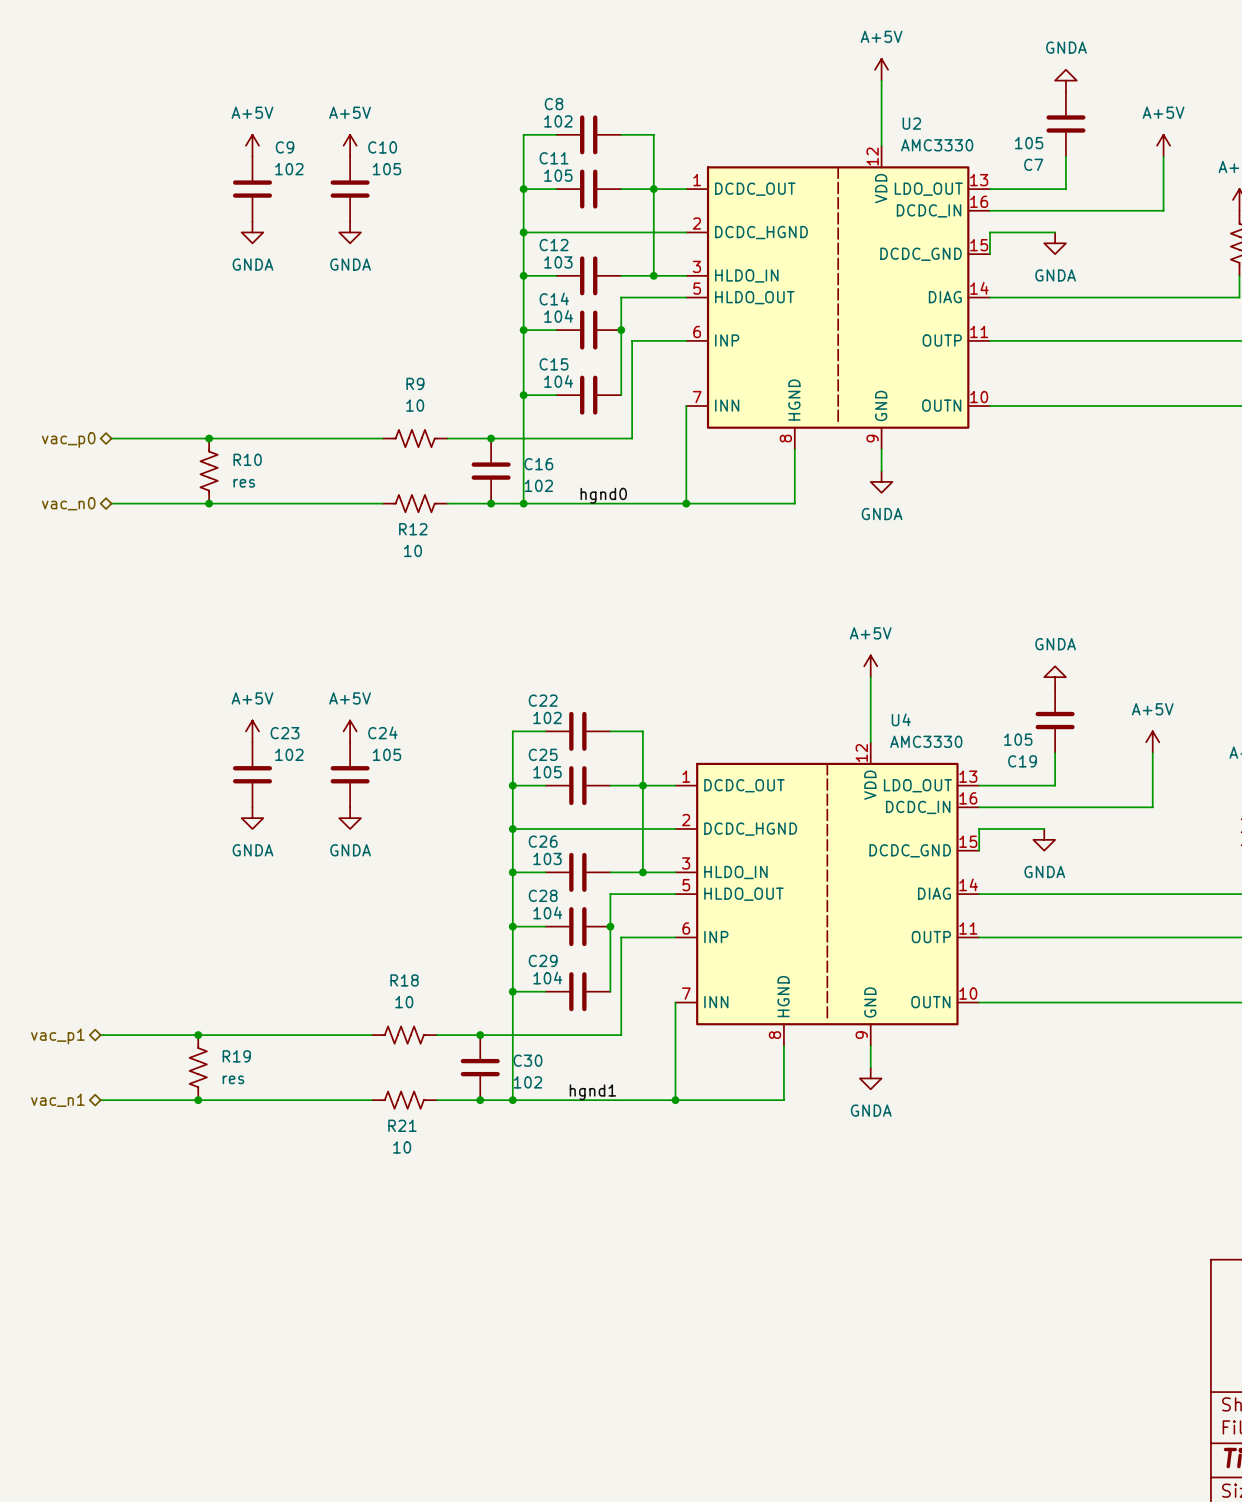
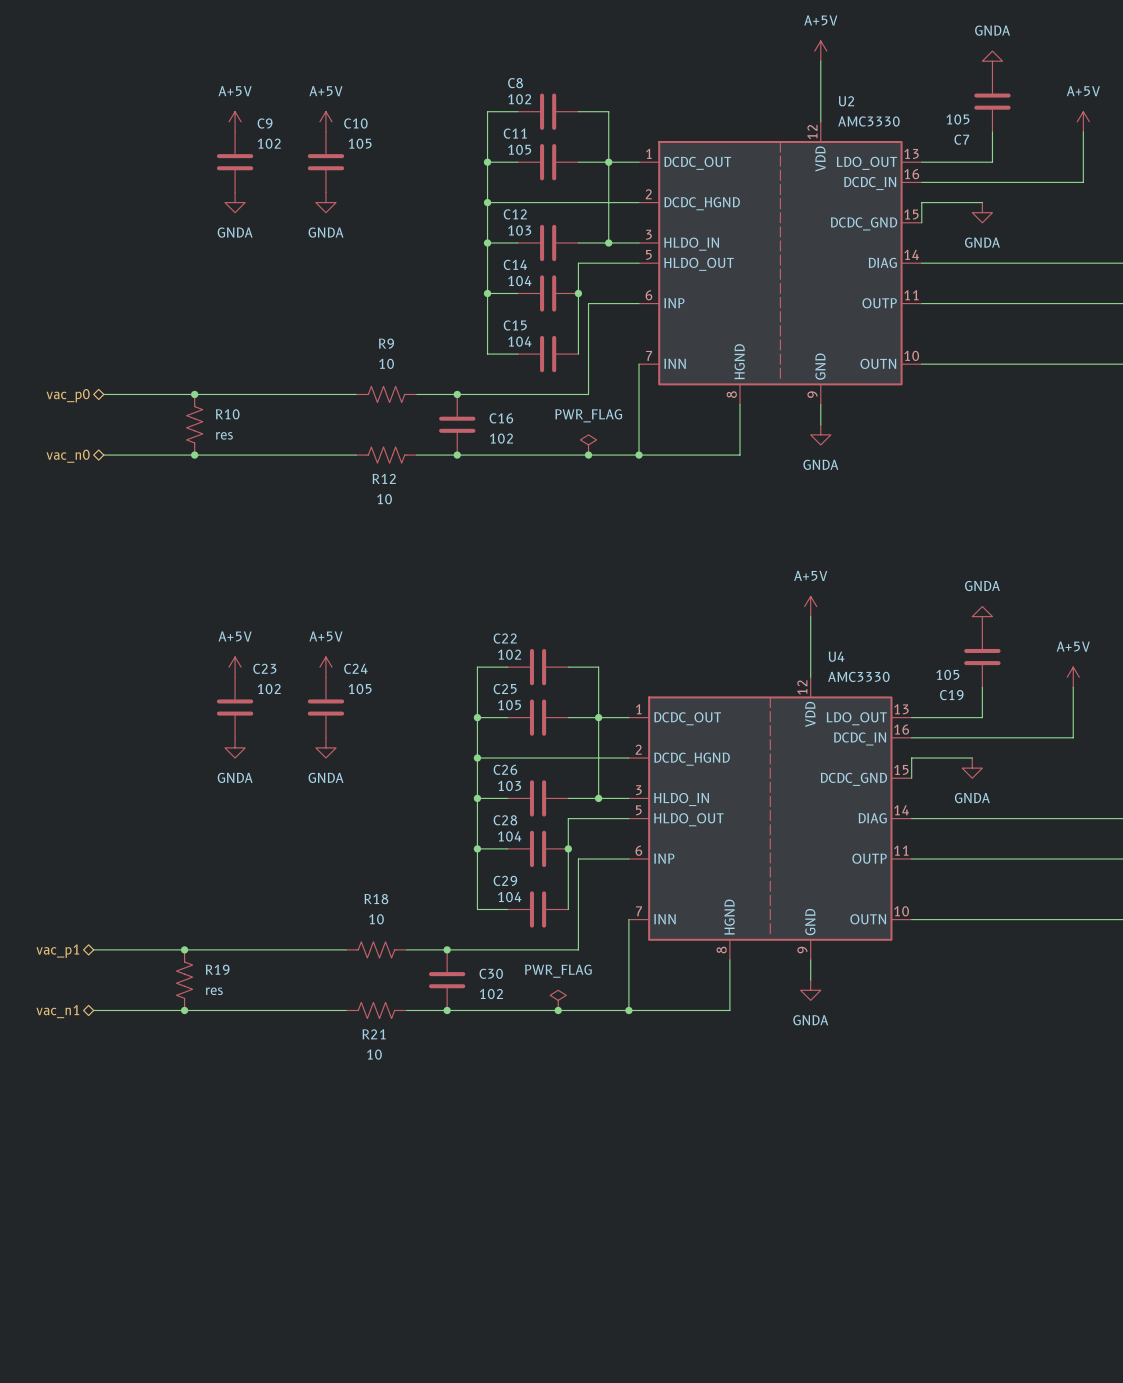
wire: (523, 395) (523, 503) -> none
junction: (523, 395) -> none
power symbol: none -> PWR_FLAG (588, 444)
label: hgnd0 (603, 495) -> none
junction: (523, 503) -> none
junction: none -> (588, 455)
wire: (512, 991) (512, 1100) -> none
junction: (512, 991) -> none
power symbol: none -> PWR_FLAG (558, 1000)
label: hgnd1 (592, 1092) -> none
junction: (512, 1100) -> none
junction: none -> (558, 1010)

